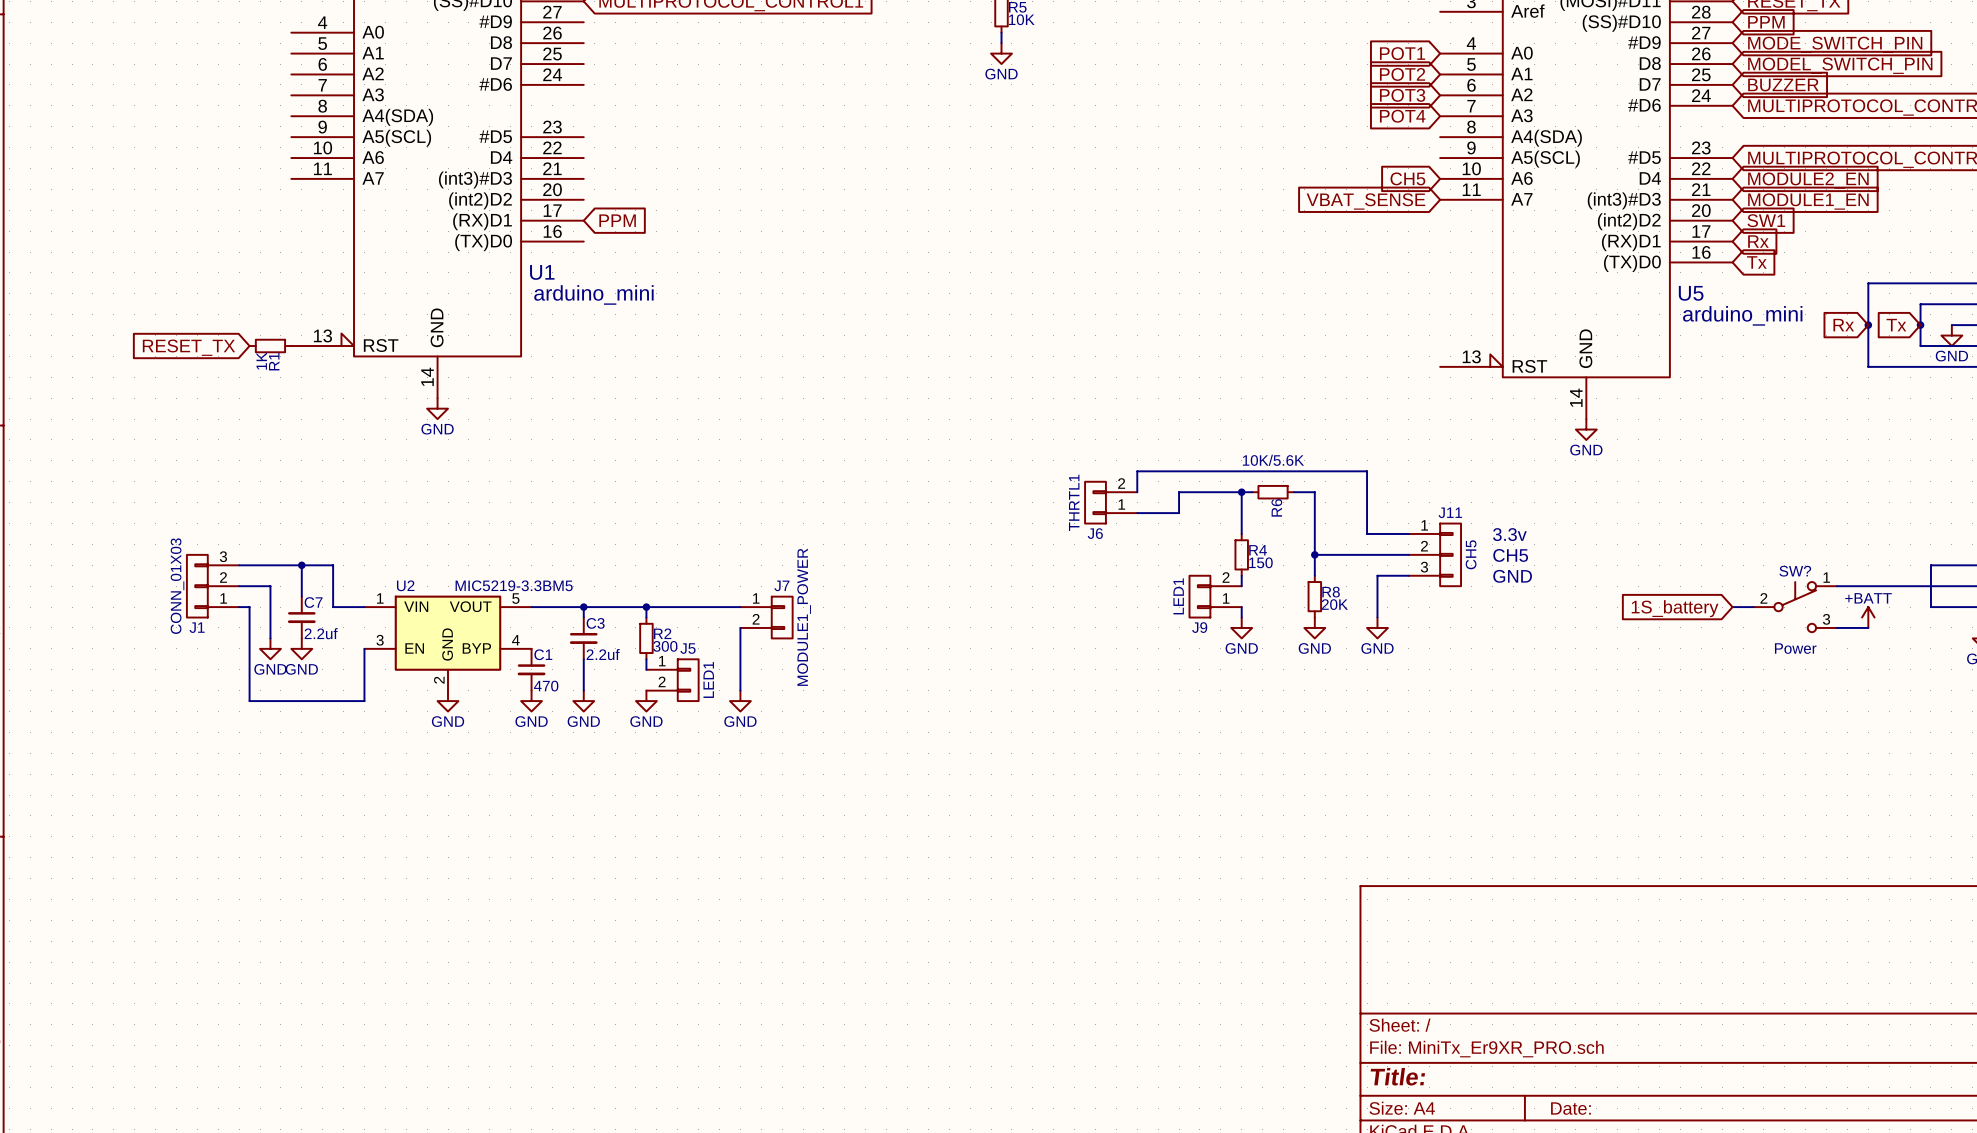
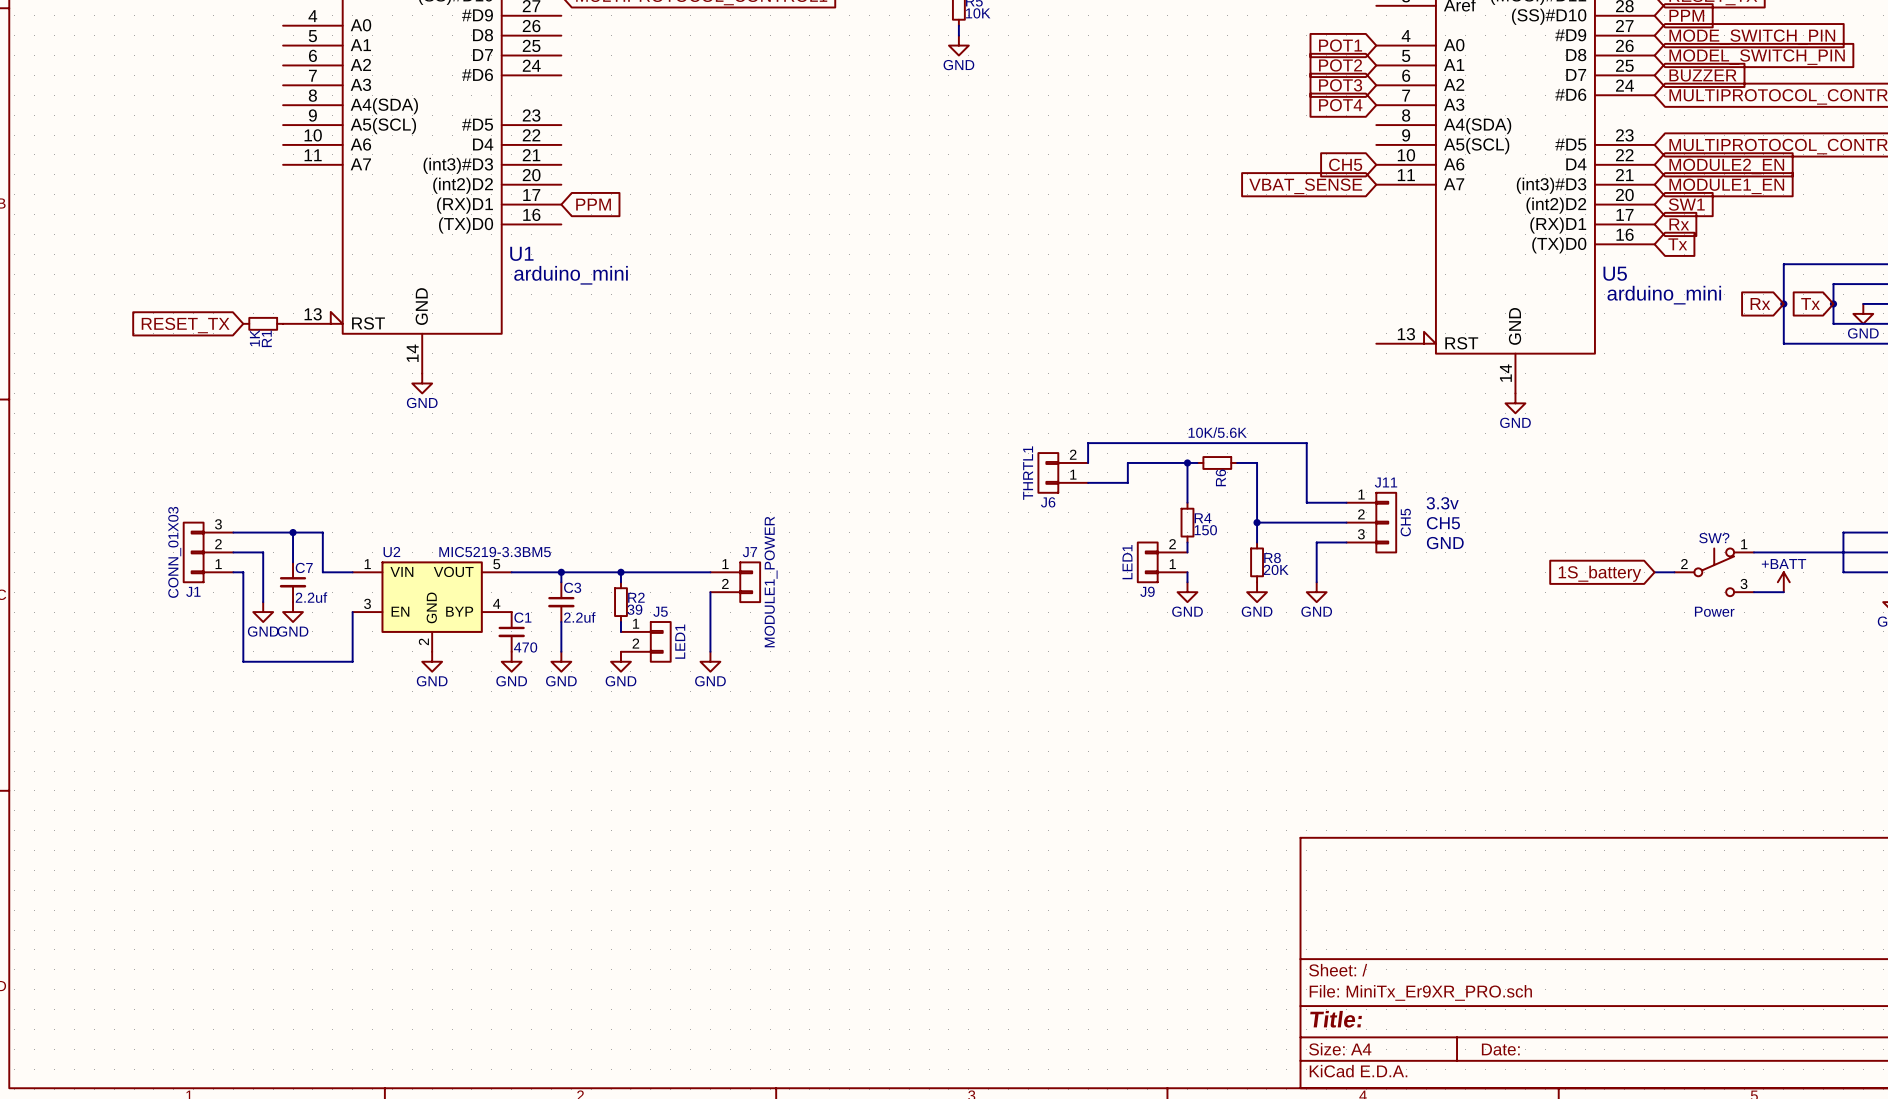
R2 value: 300 (665, 646) -> 39 (634, 609)

